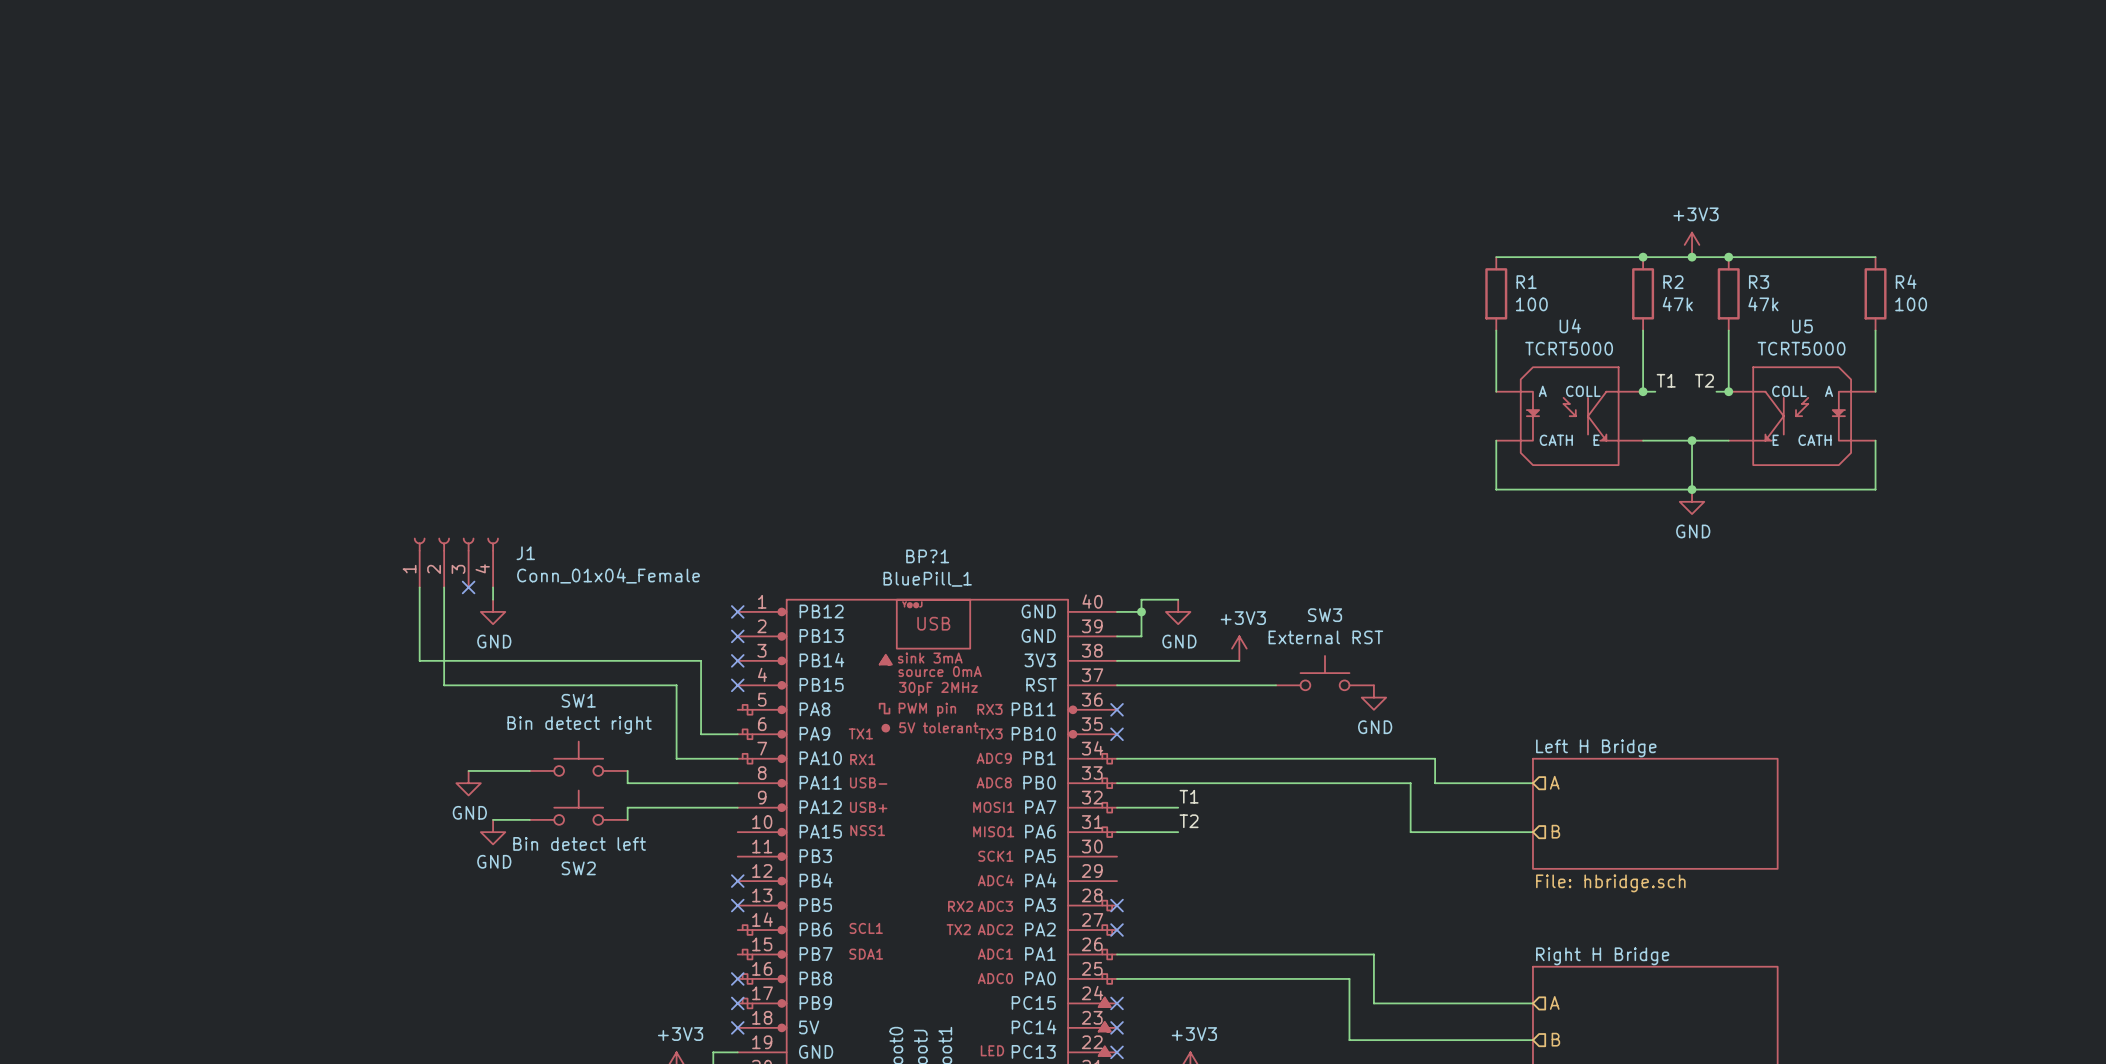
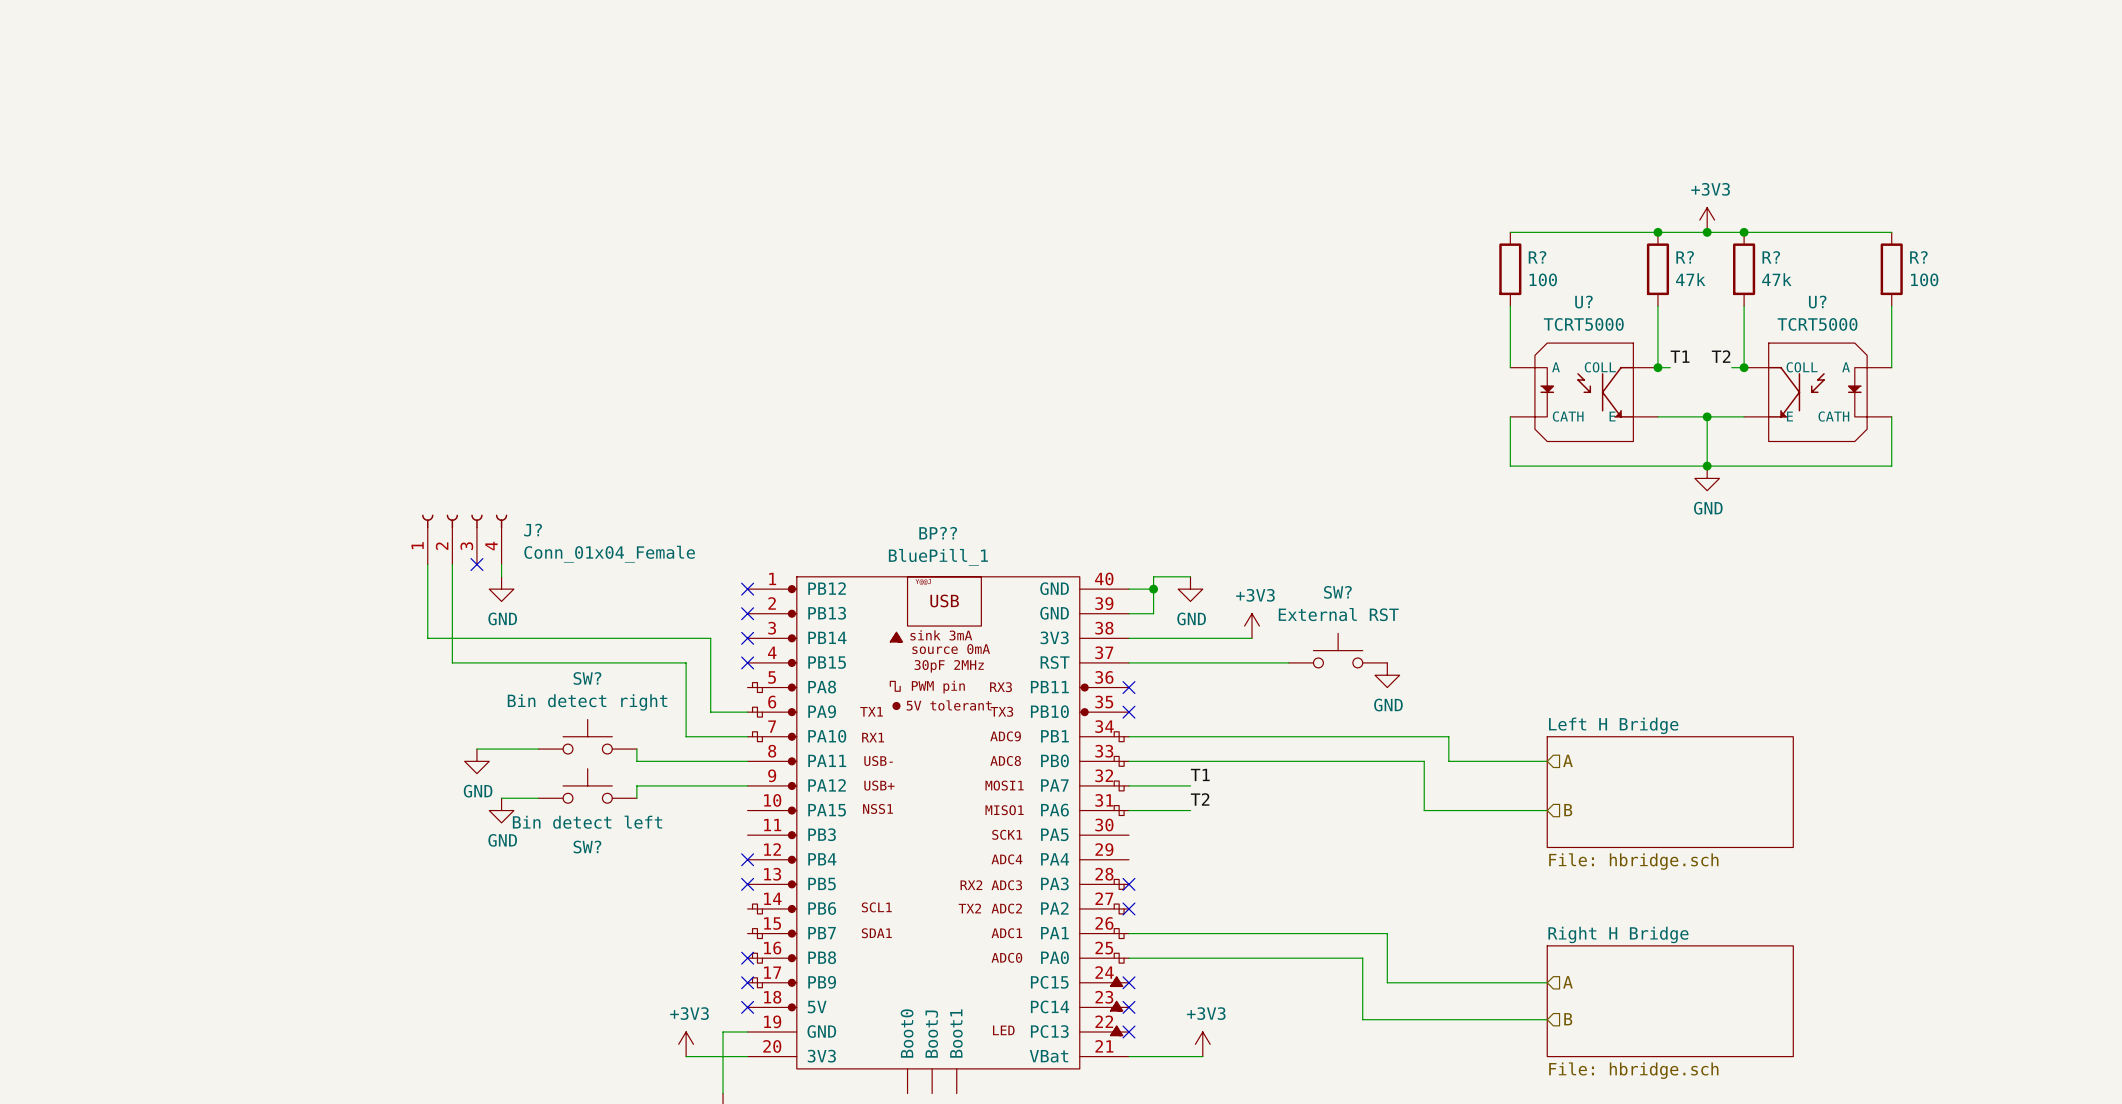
R4 name: R4 (1906, 281) -> R? (1918, 257)
R1 name: R1 (1526, 282) -> R? (1537, 257)
R2 name: R2 (1673, 282) -> R? (1685, 257)
R3 name: R3 (1759, 282) -> R? (1771, 257)
U4 name: U4 (1570, 326) -> U? (1583, 302)
U5 name: U5 (1802, 326) -> U? (1817, 302)
J1 name: J1 (525, 553) -> J? (533, 530)
BP?1 name: BP?1 (927, 556) -> BP?? (938, 533)
SW3 name: SW3 (1325, 615) -> SW? (1337, 592)
SW1 name: SW1 (578, 700) -> SW? (587, 678)
SW2 name: SW2 (578, 868) -> SW? (587, 847)

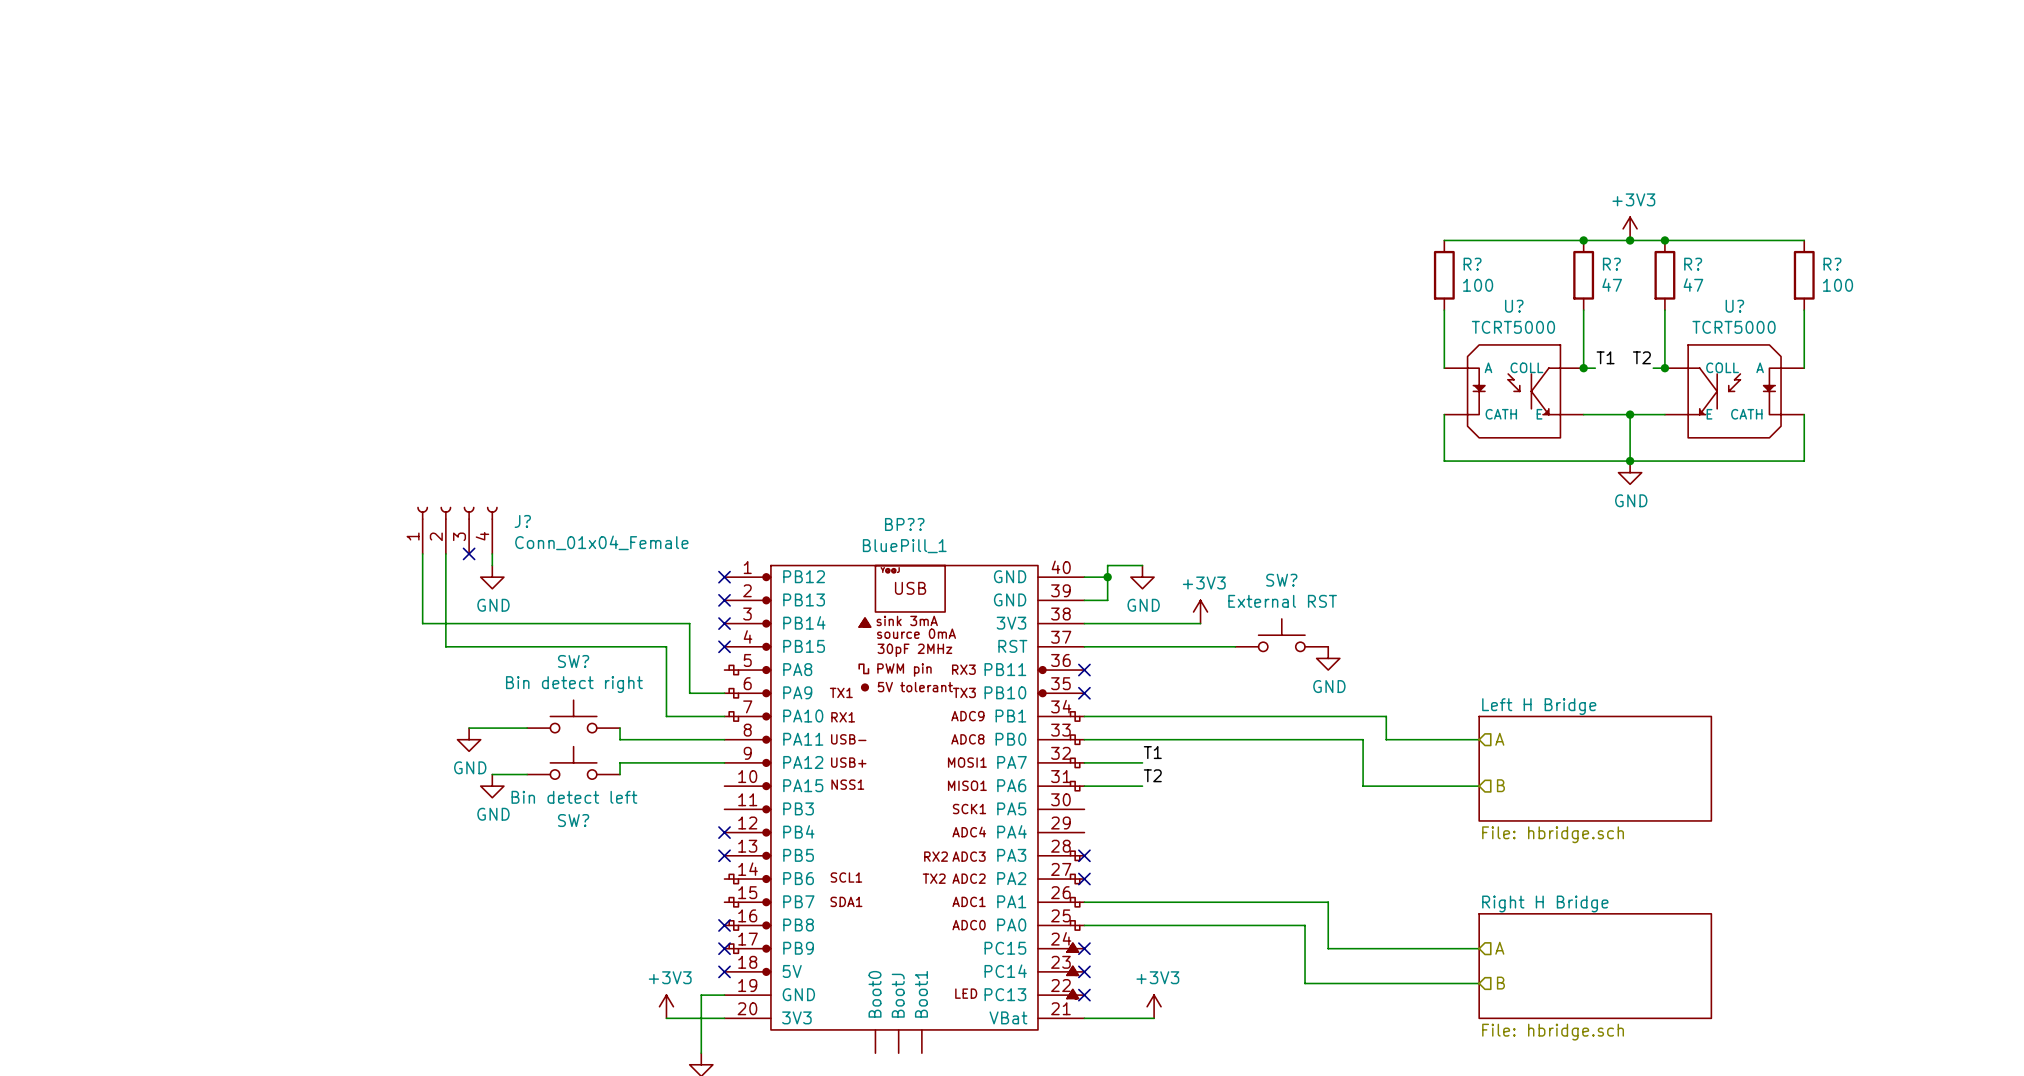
R? value: 47k (1690, 279) -> 47 (1612, 285)
R? value: 47k (1776, 279) -> 47 (1693, 285)

